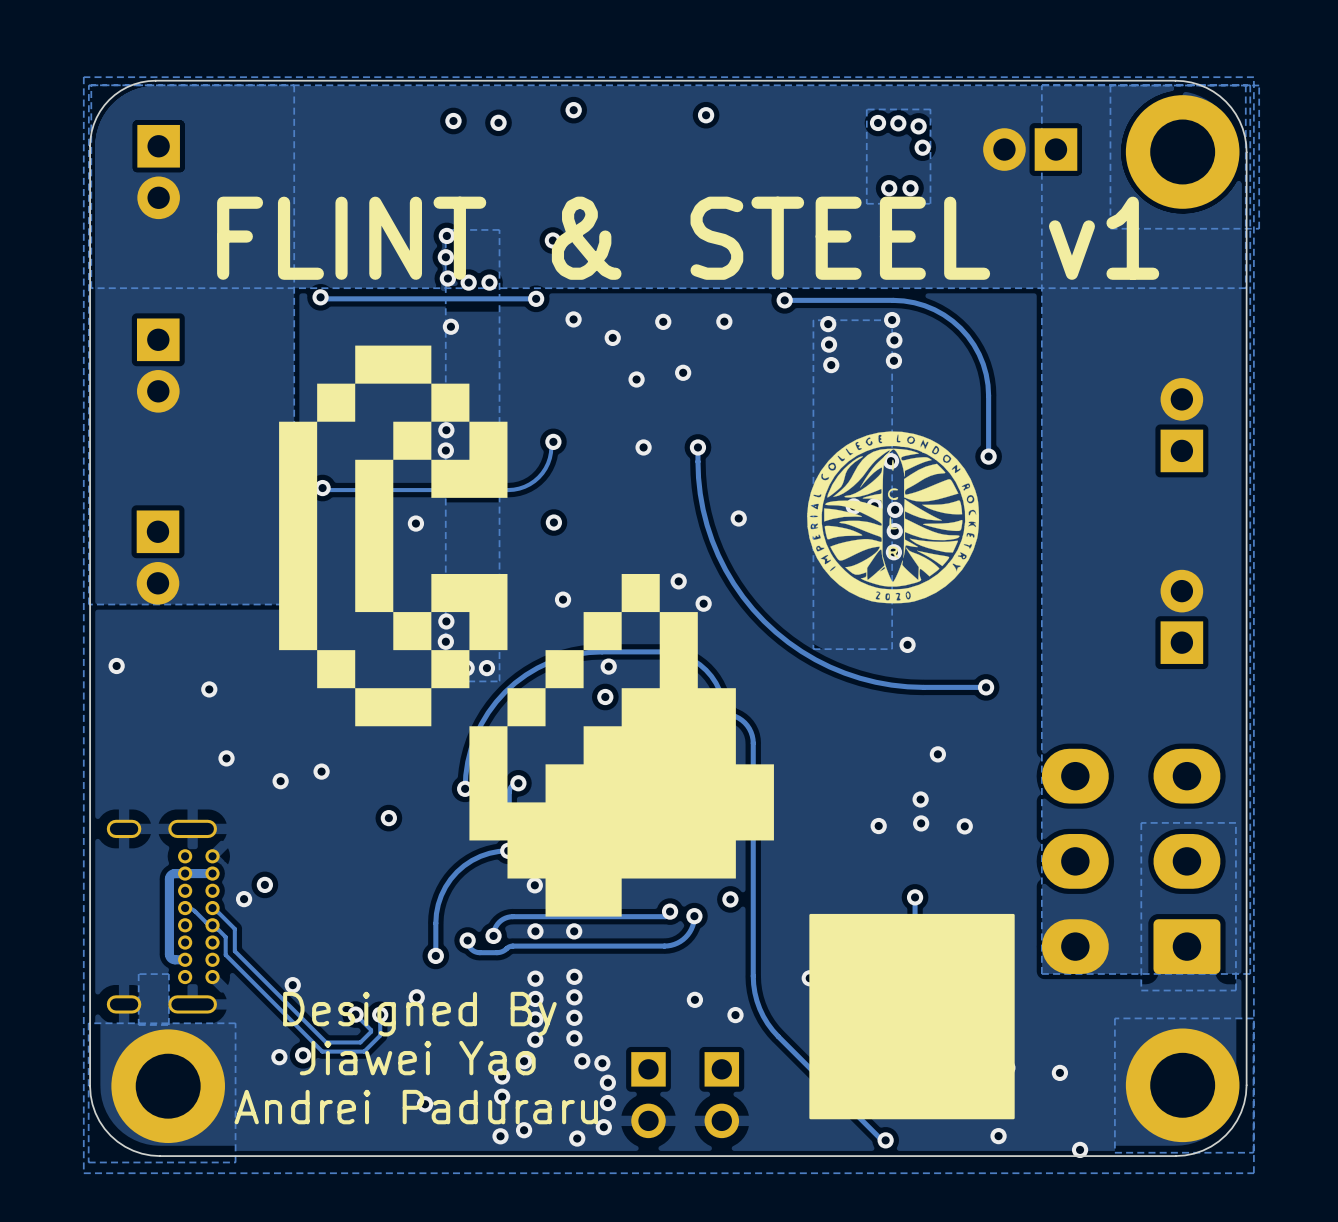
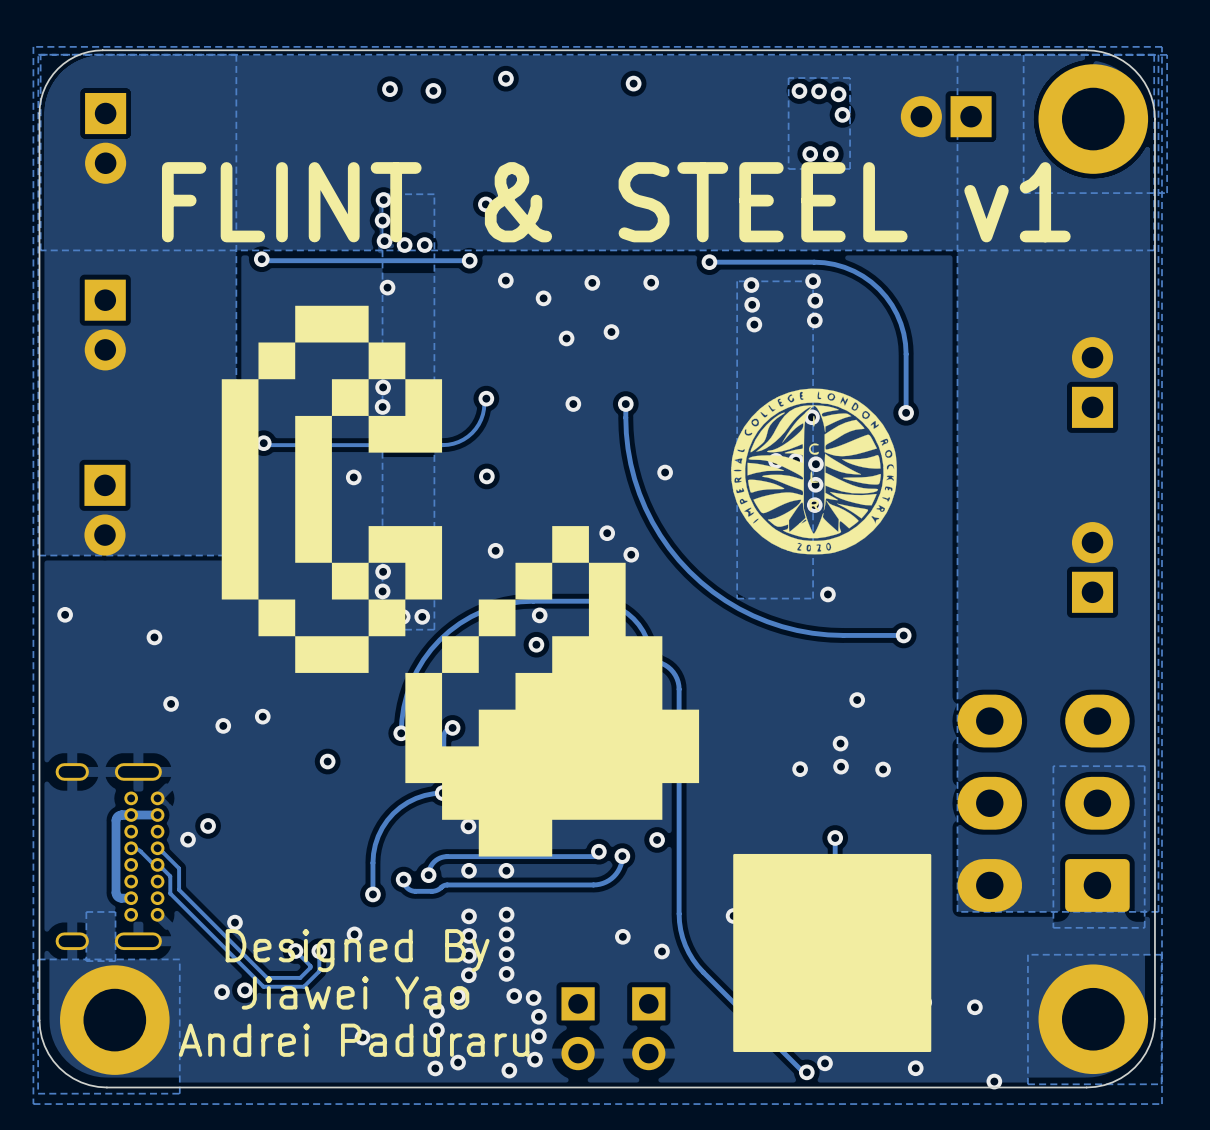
via: none -> (825, 1063)

